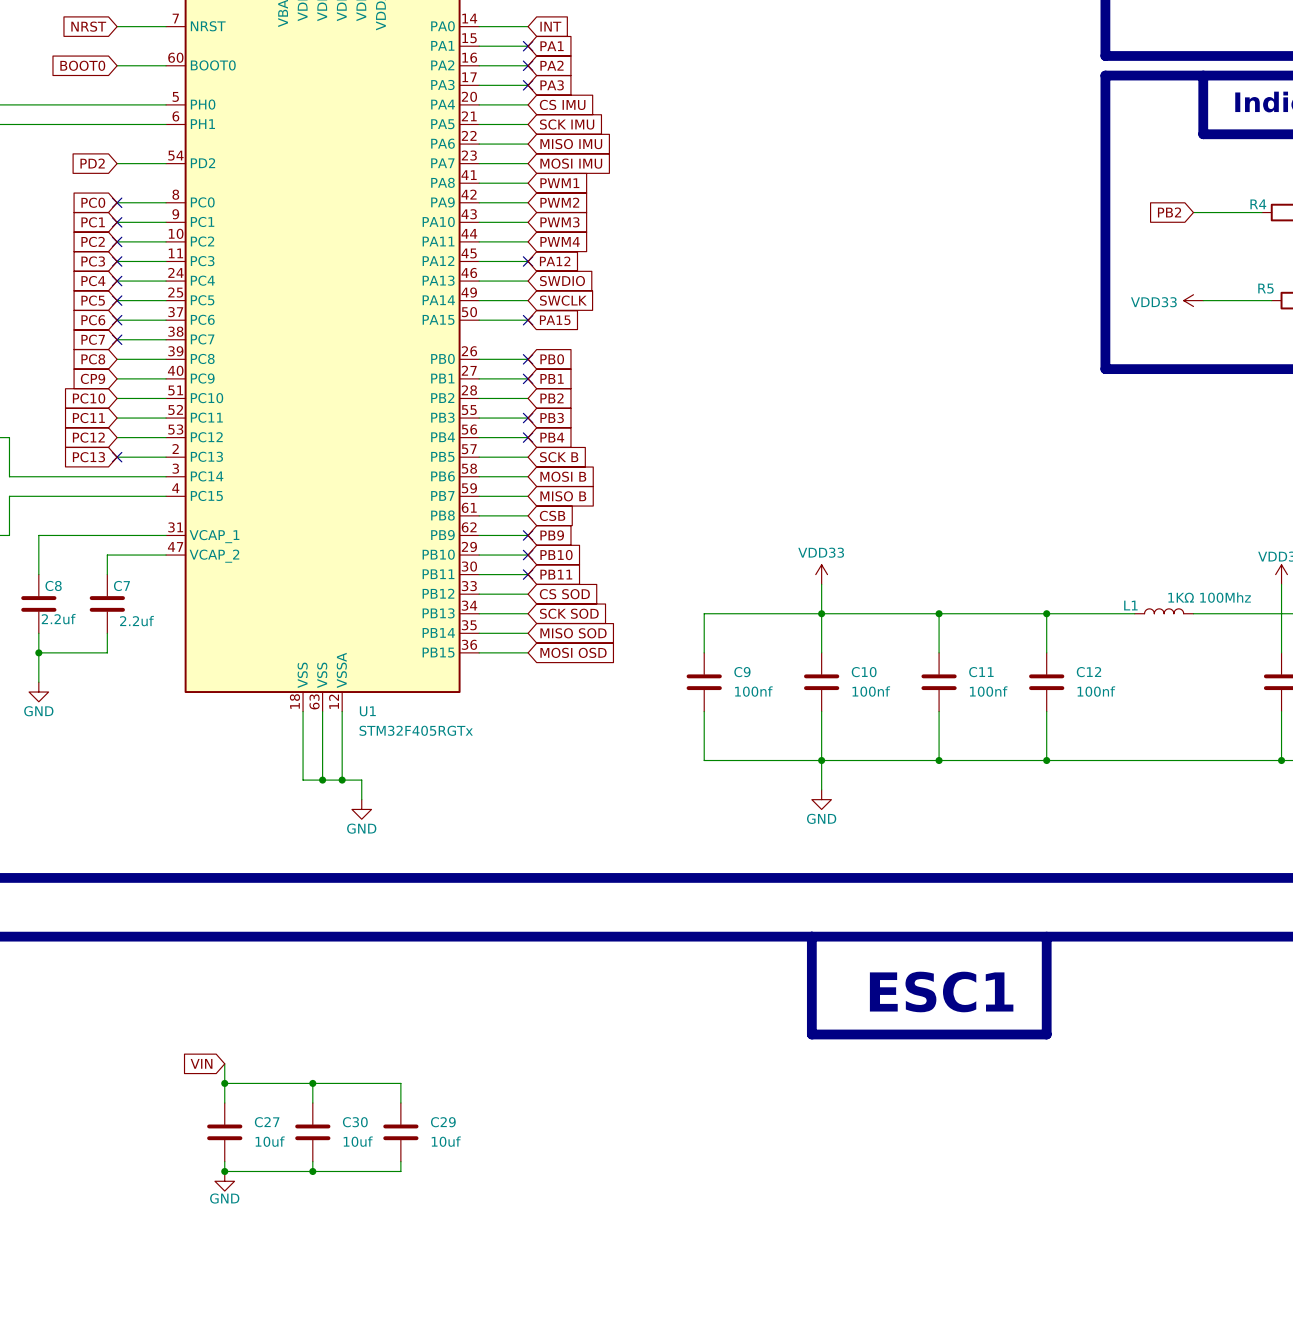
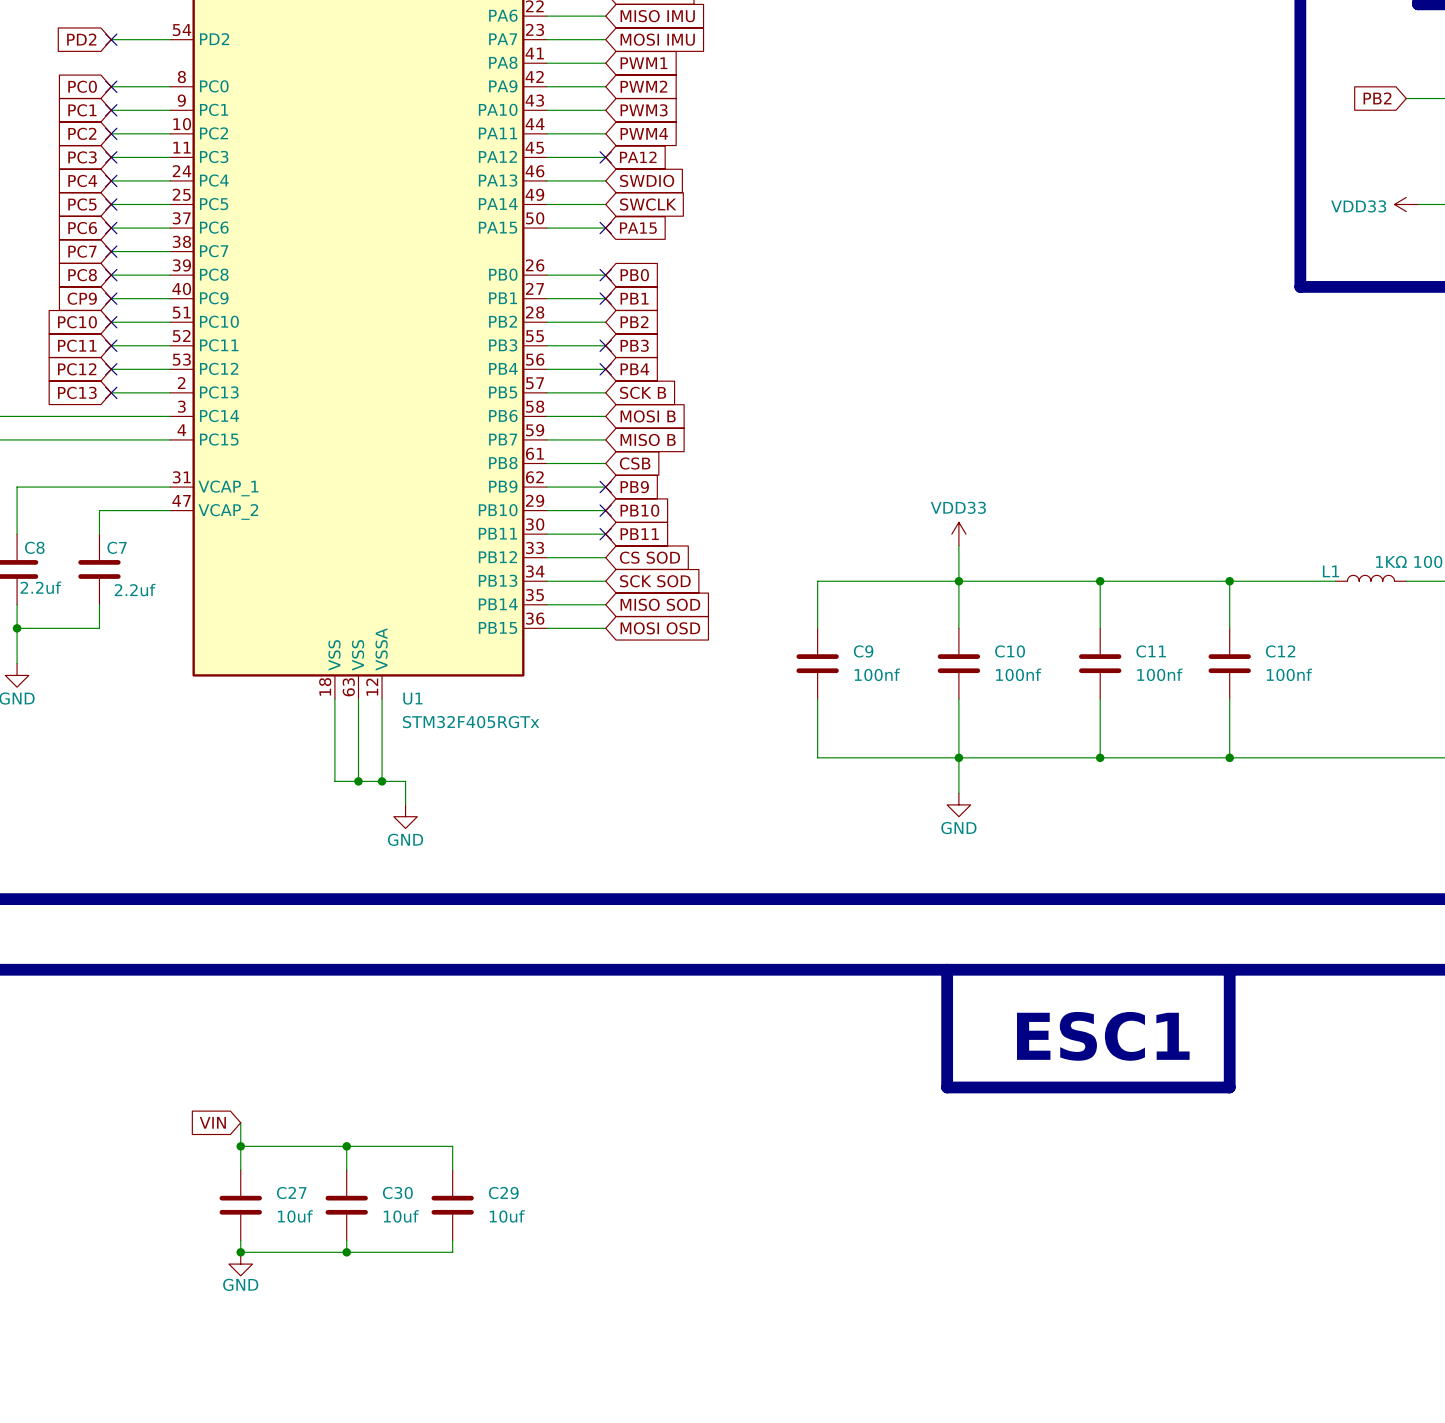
no-connect mark: none -> (111, 39)
no-connect mark: none -> (111, 275)
no-connect mark: none -> (111, 298)
no-connect mark: none -> (111, 322)
no-connect mark: none -> (111, 345)
no-connect mark: none -> (111, 369)

